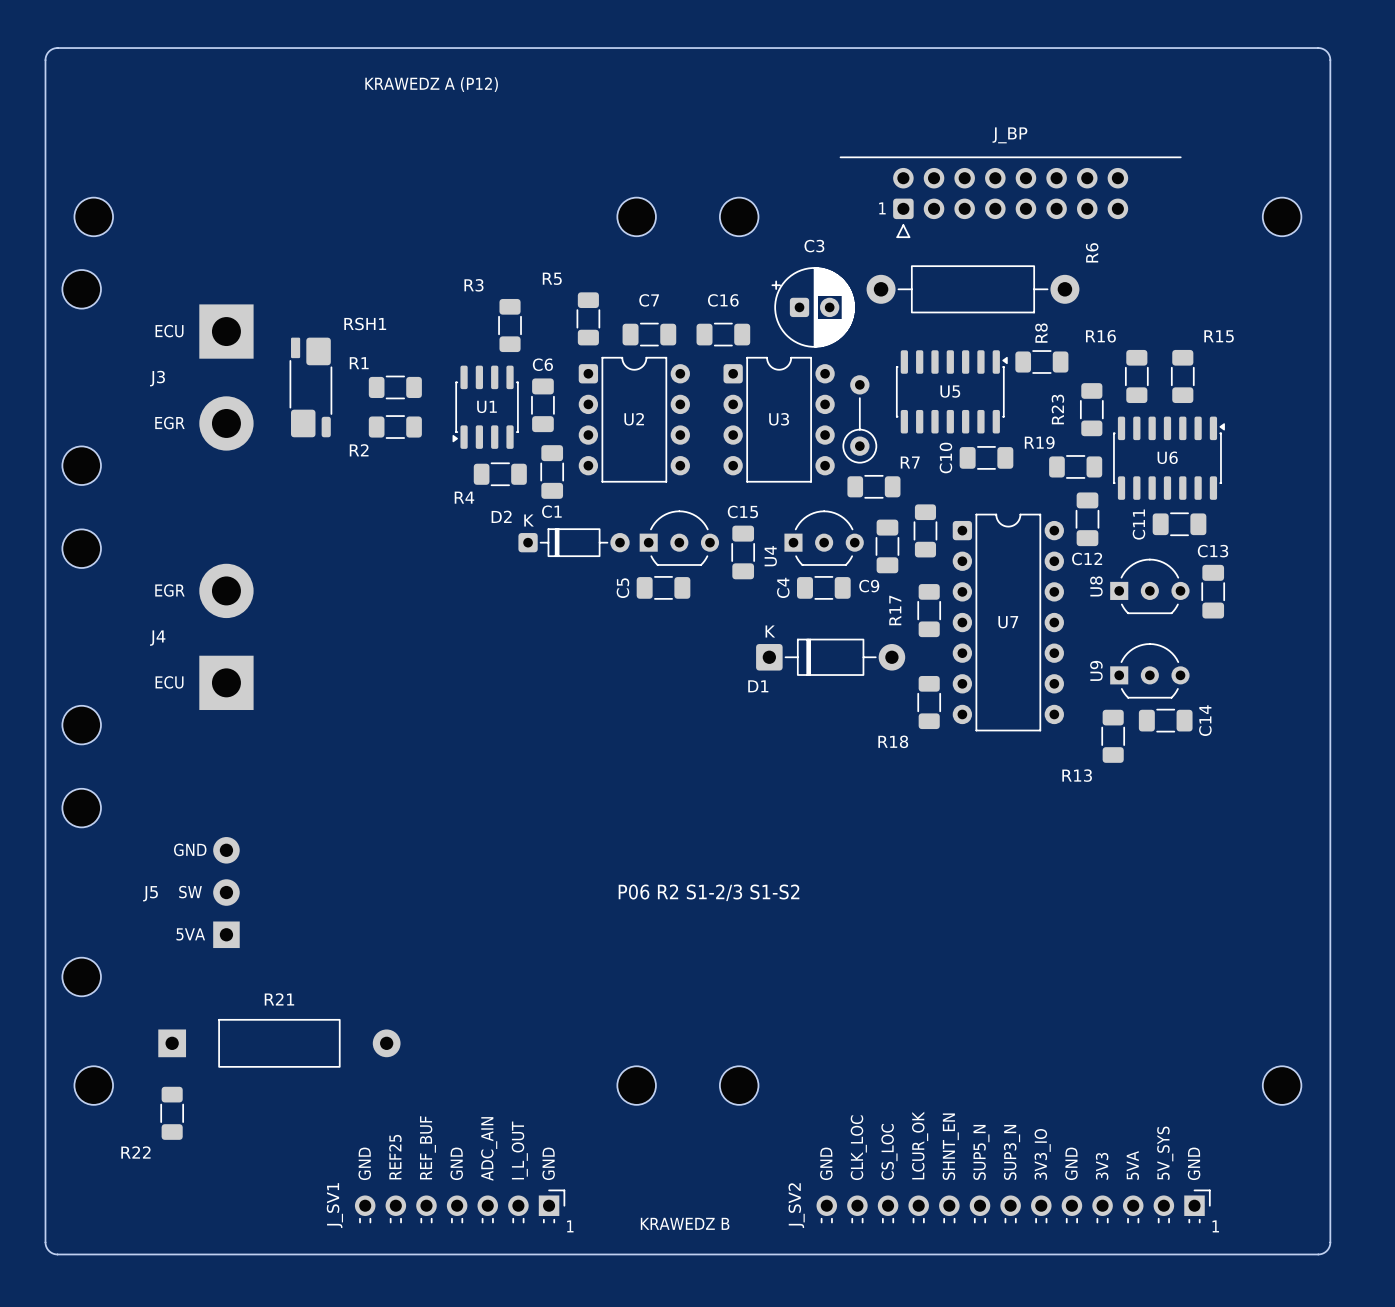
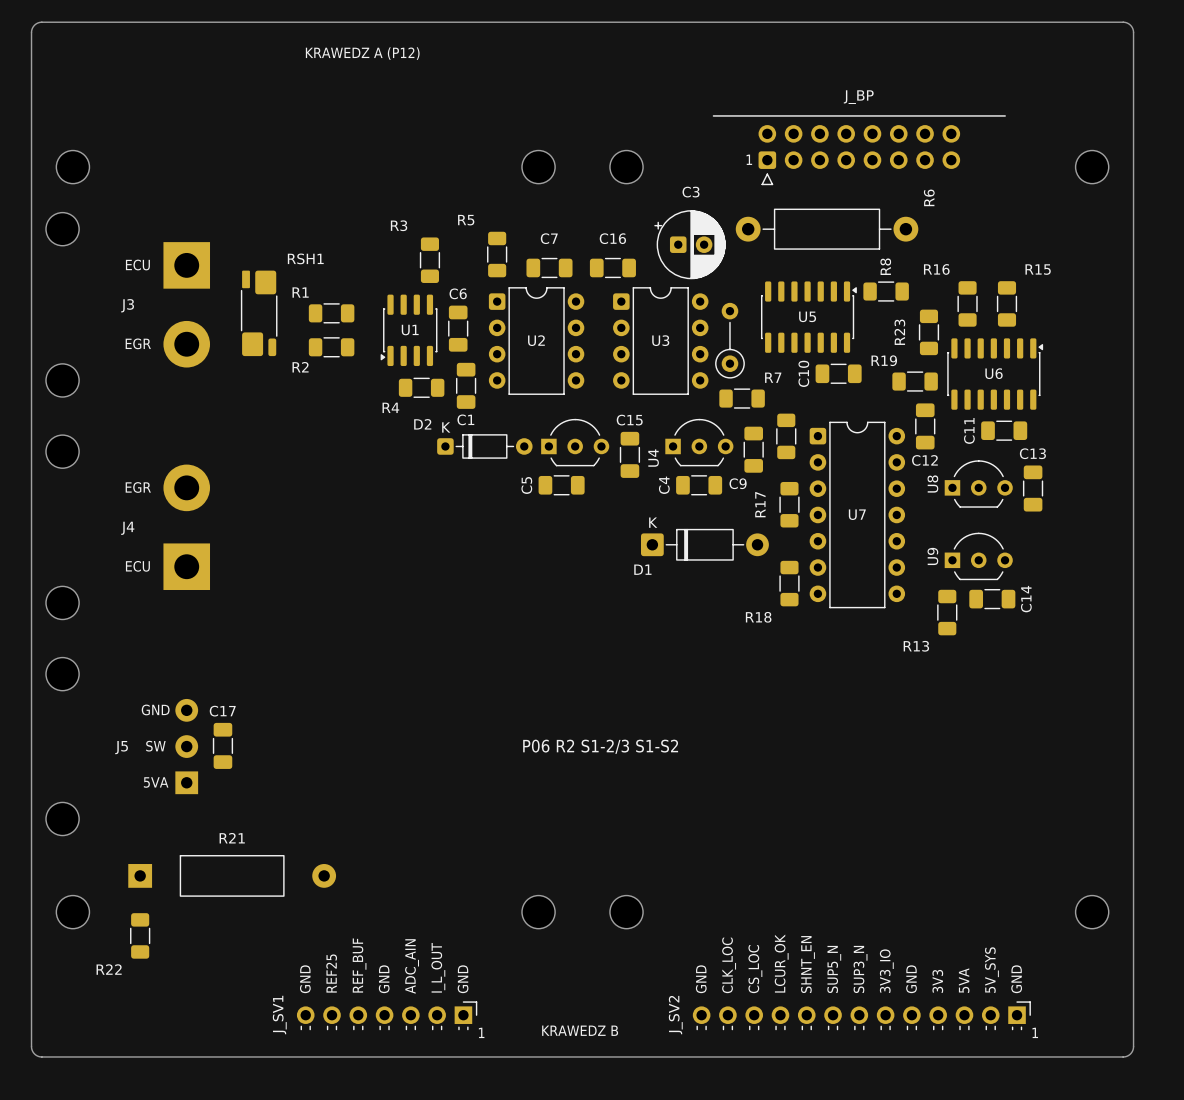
C17: none -> (222, 745)

